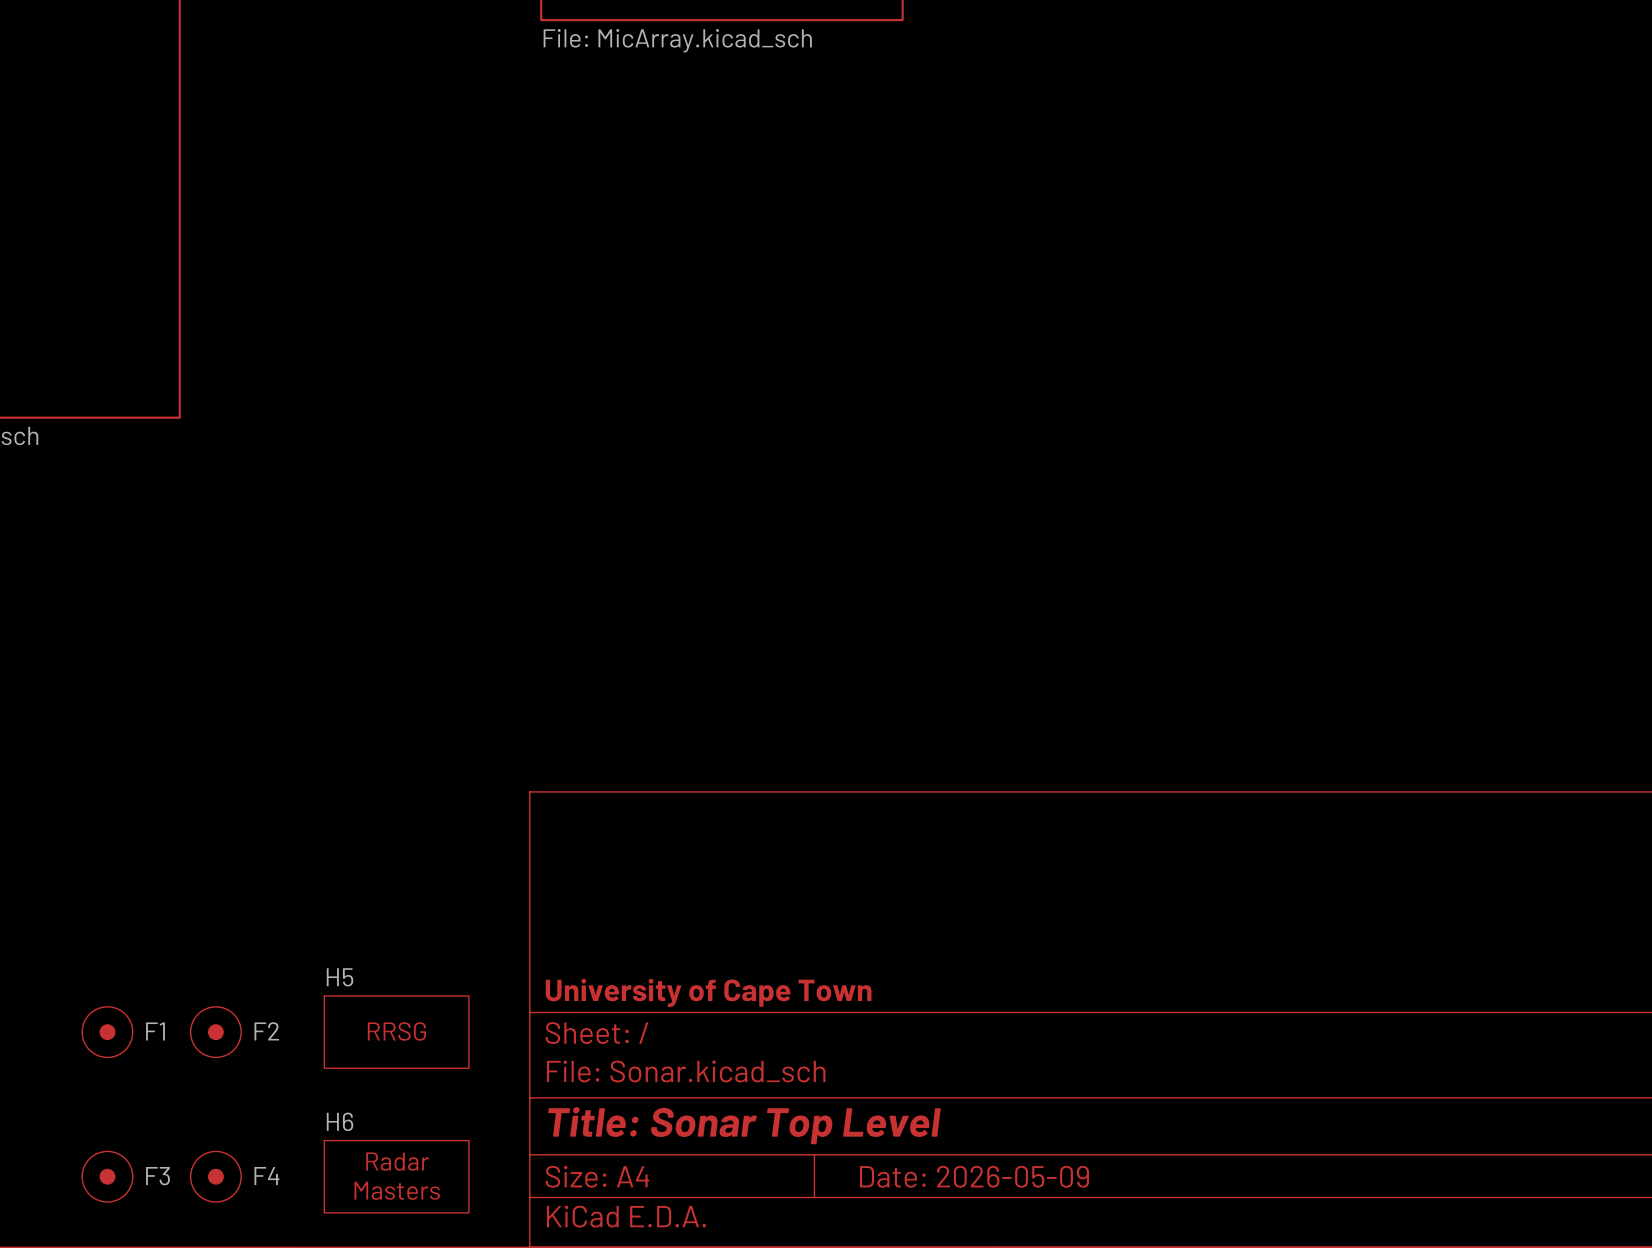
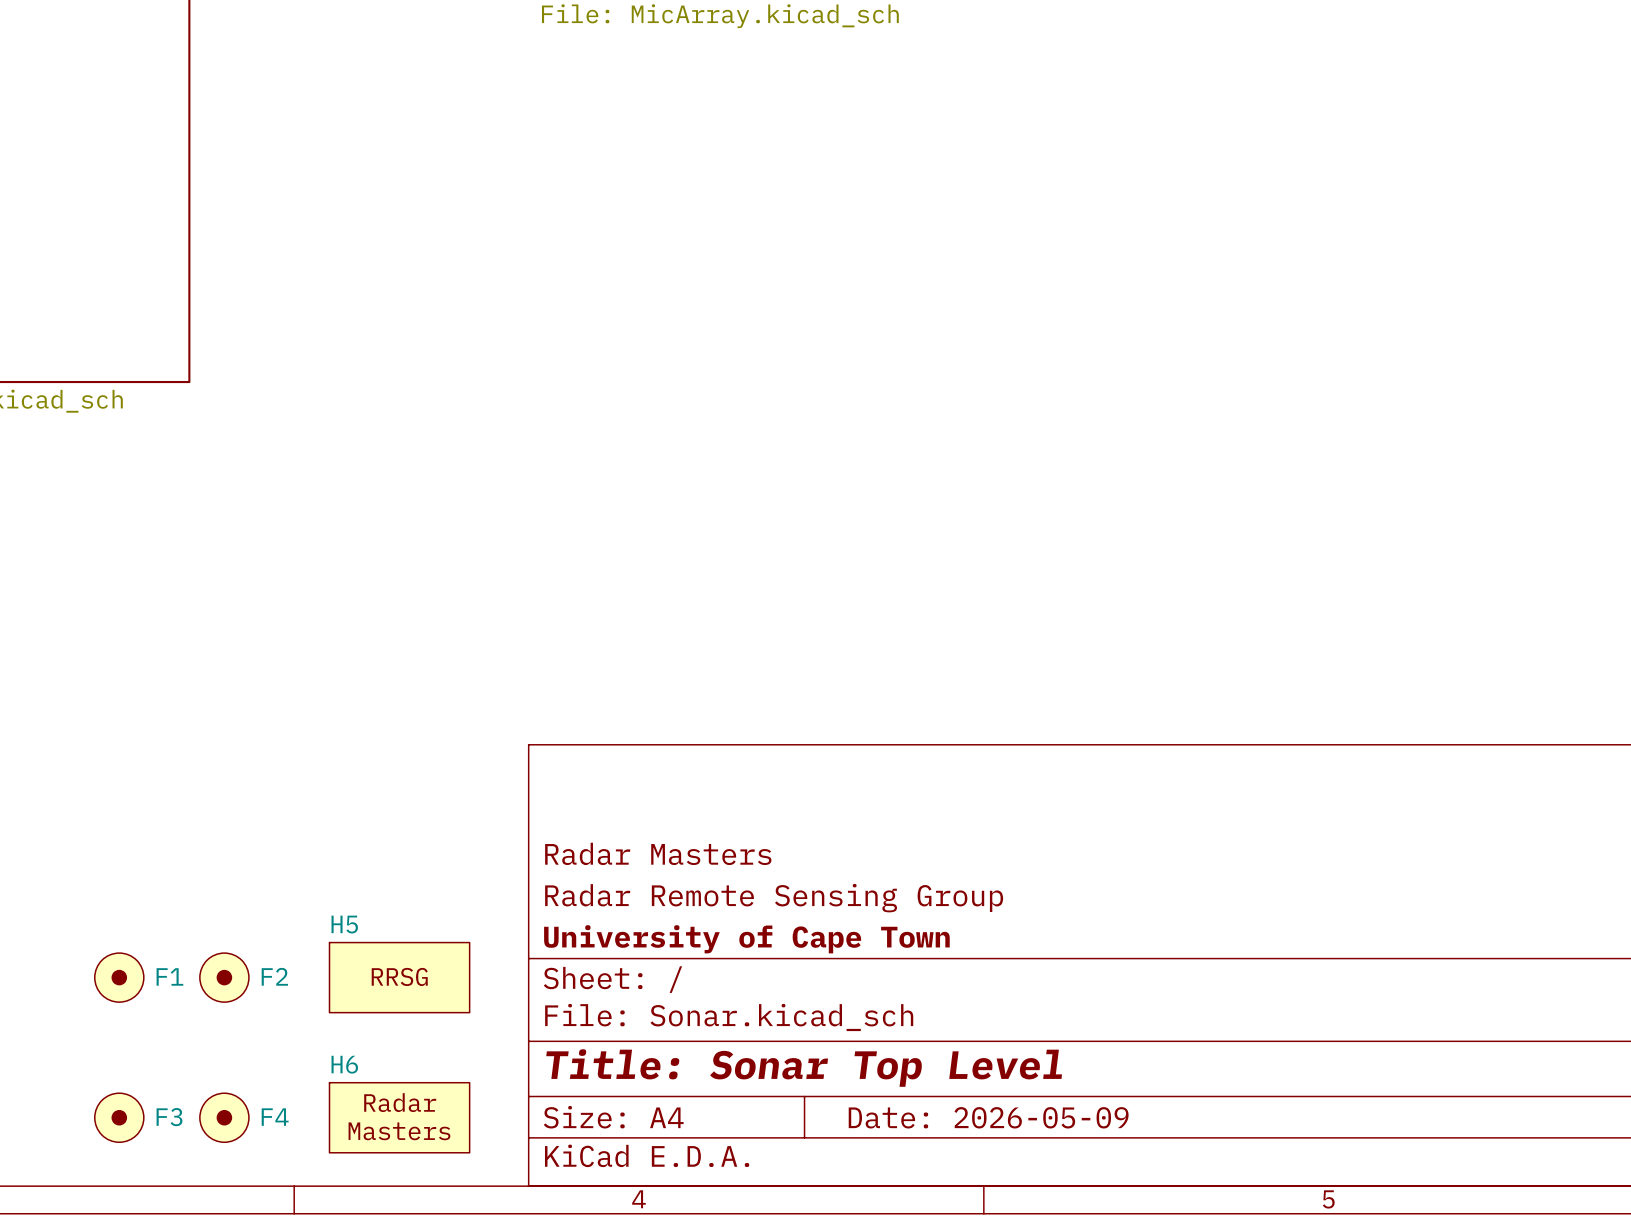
title block: none -> Radar Masters (658, 853)
title block: none -> Radar Remote Sensing Group (774, 898)

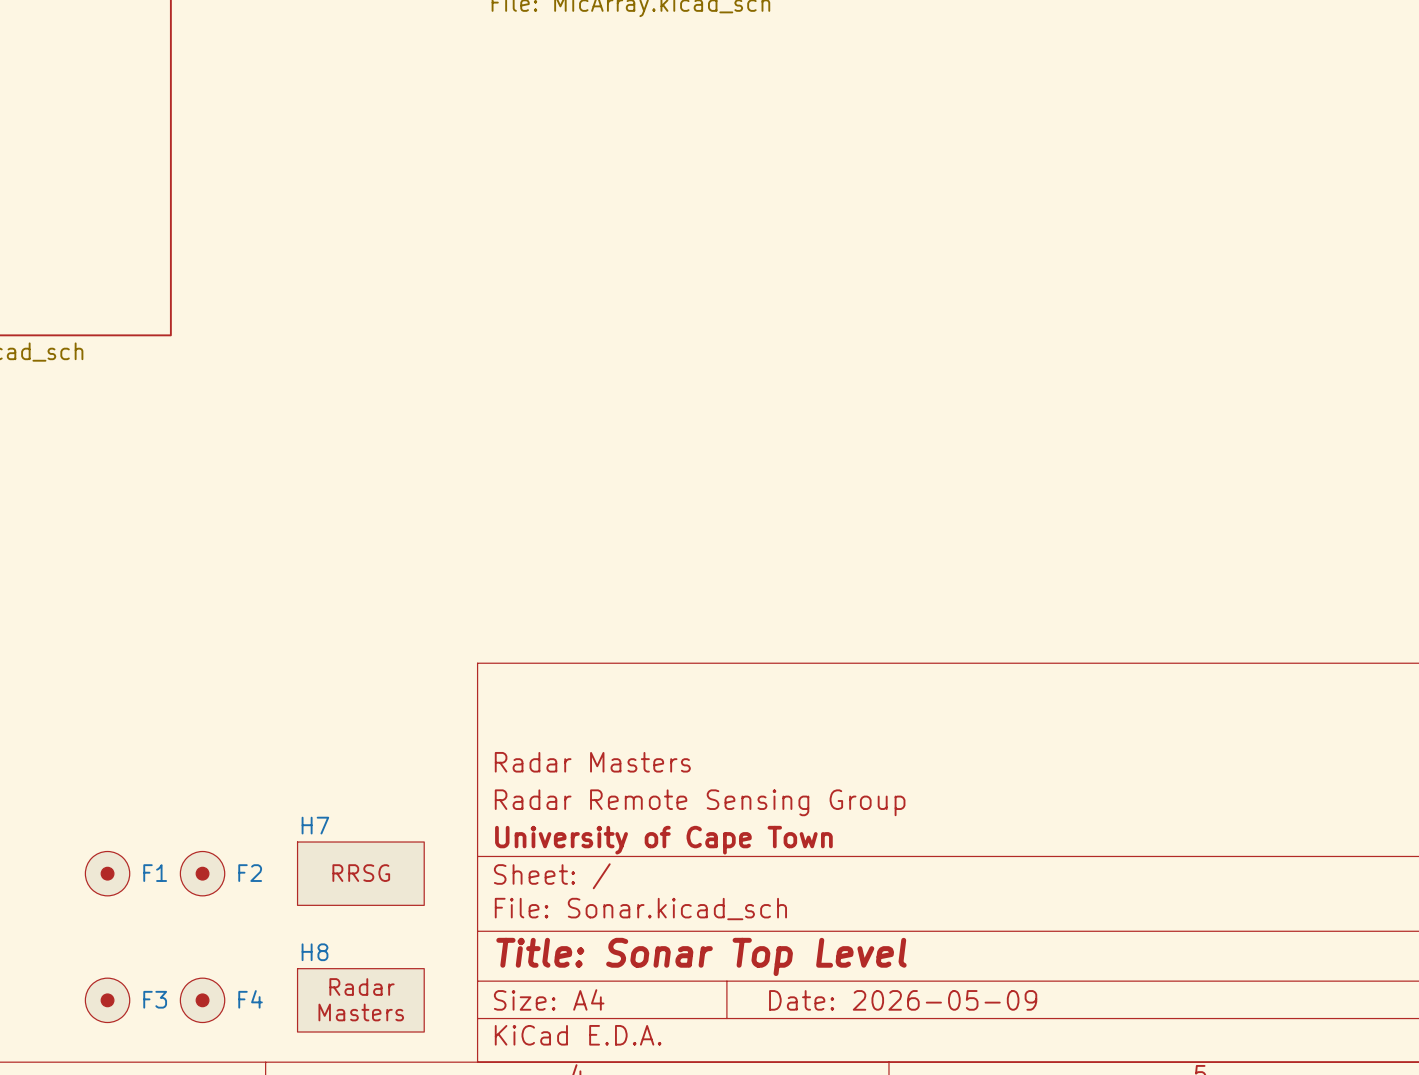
H5 name: H5 (344, 924) -> H7 (315, 825)
H6 name: H6 (344, 1064) -> H8 (315, 952)

